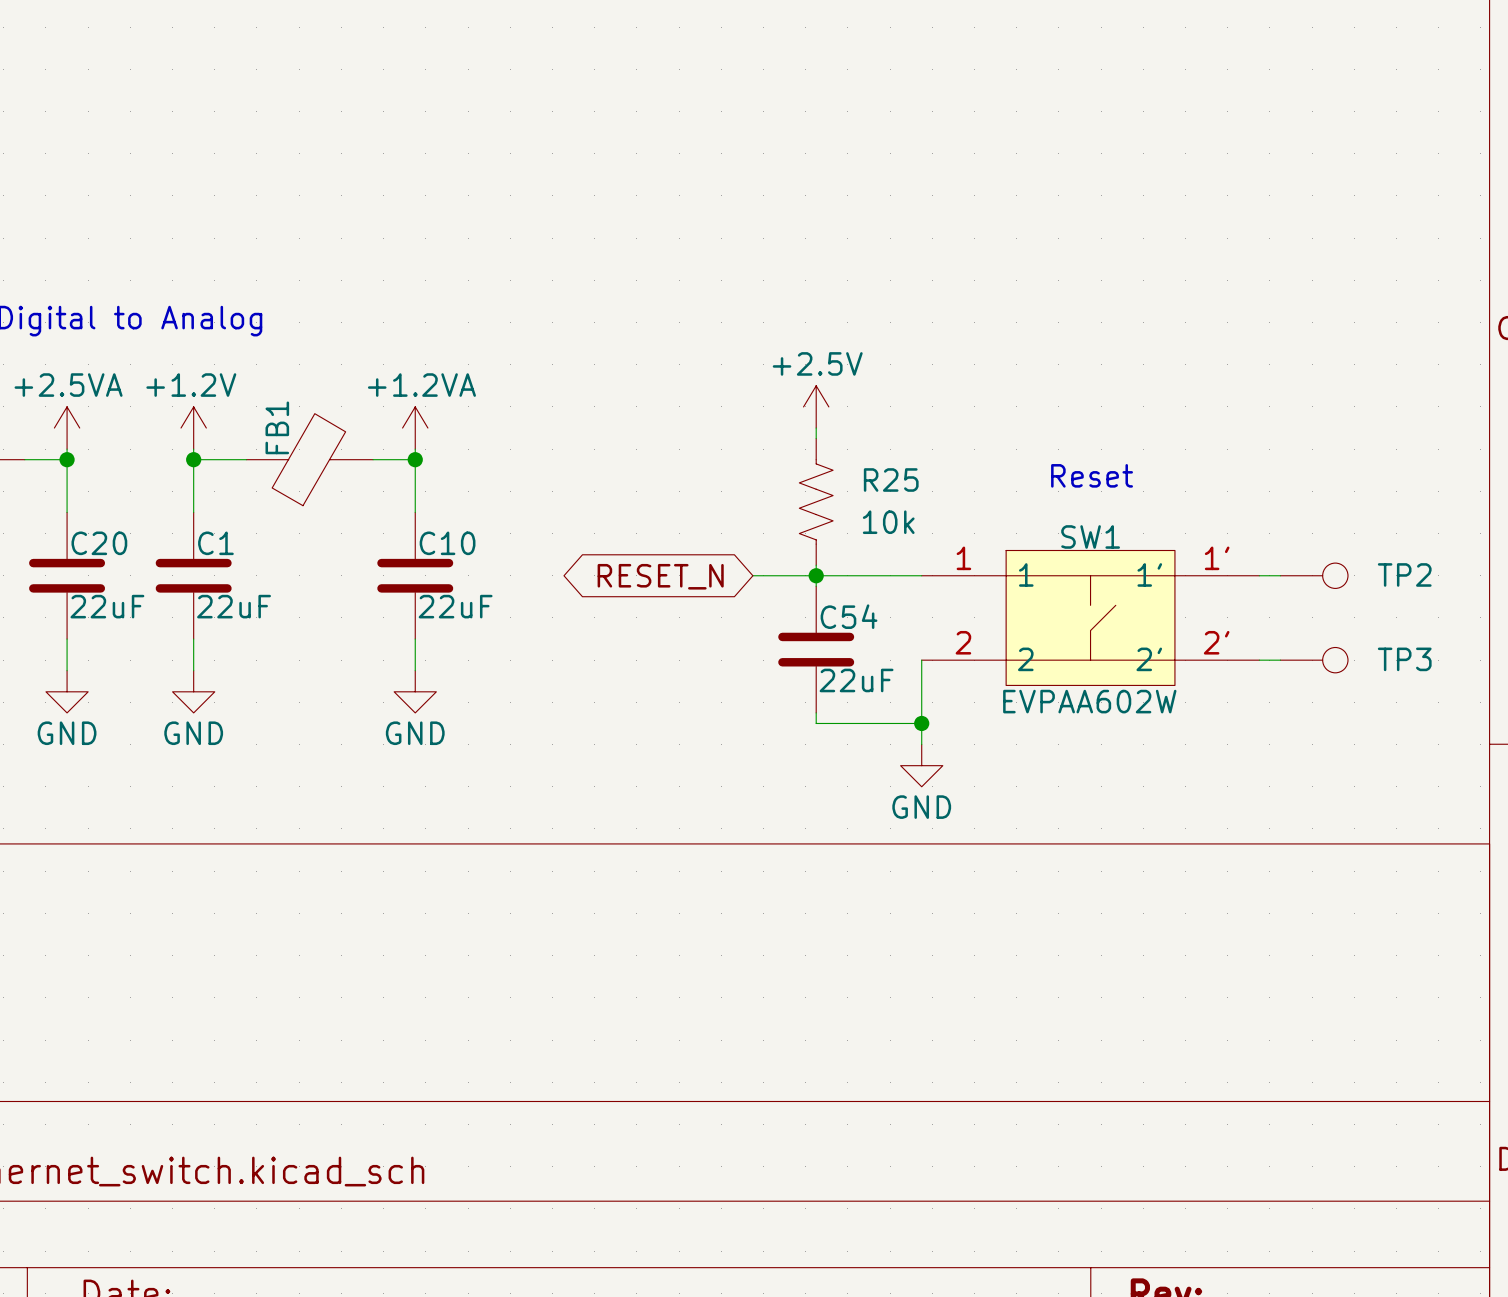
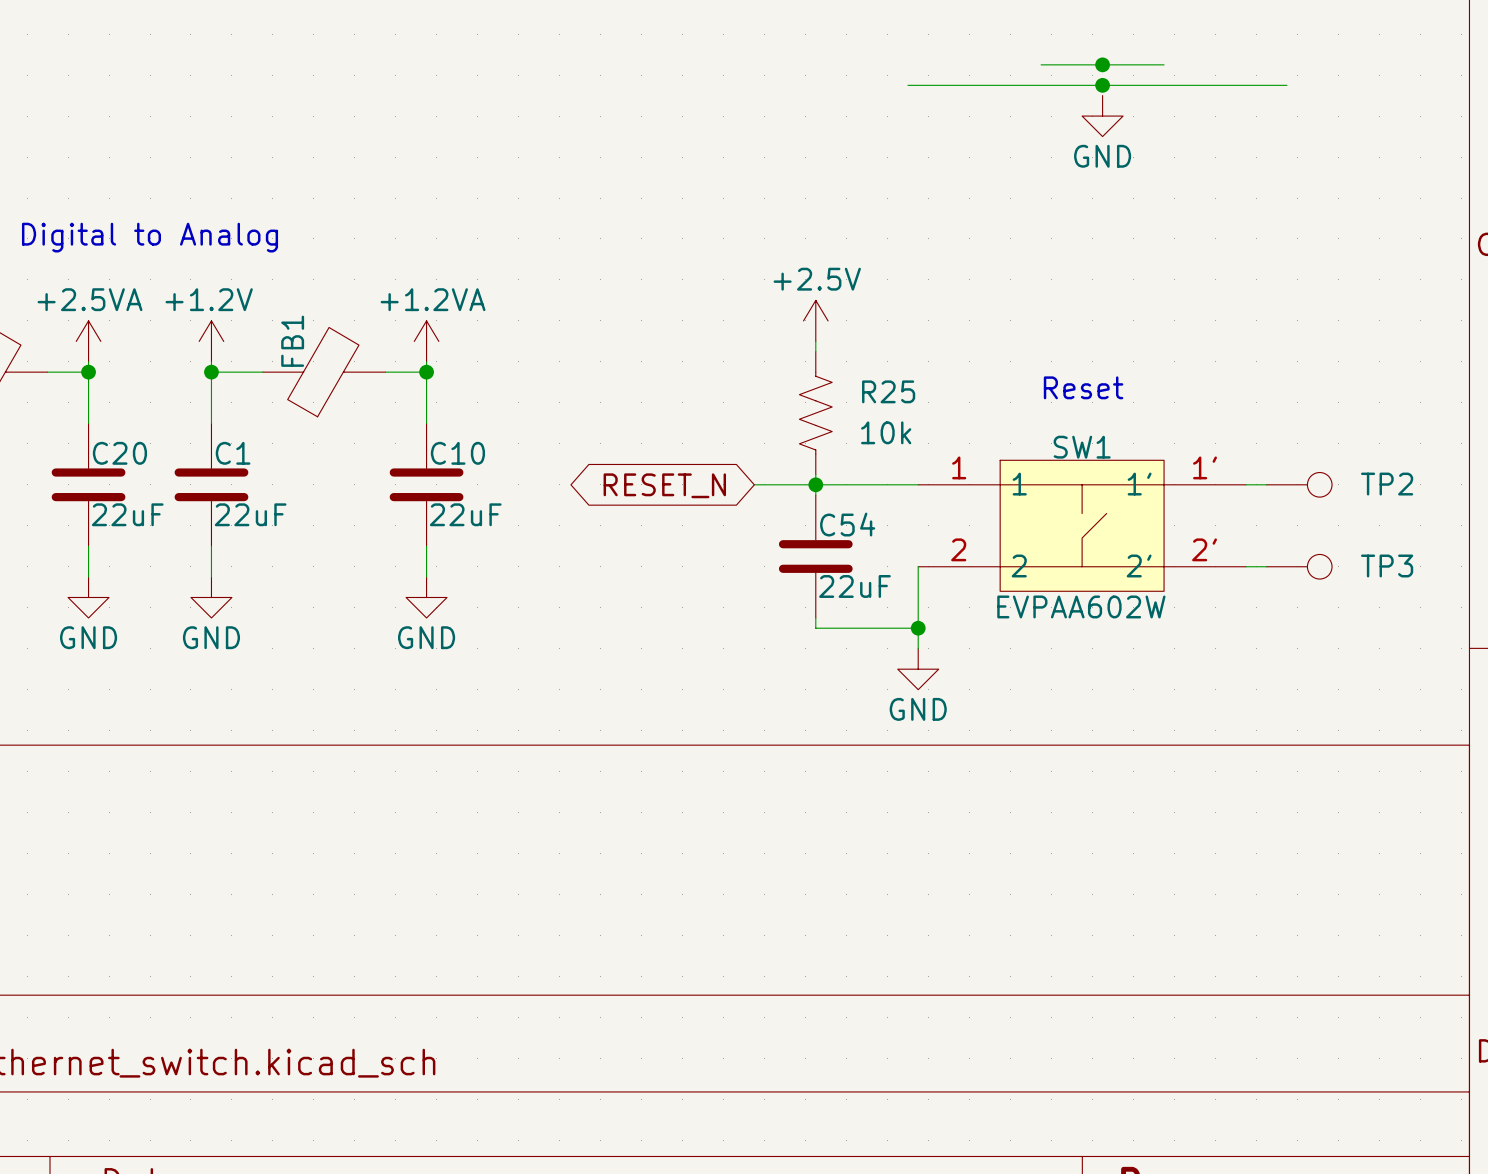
wire: none -> (1041, 64) (1164, 64)
junction: none -> (1102, 64)
wire: none -> (907, 85) (1286, 85)
junction: none -> (1102, 85)
power symbol: none -> GND (1102, 116)

